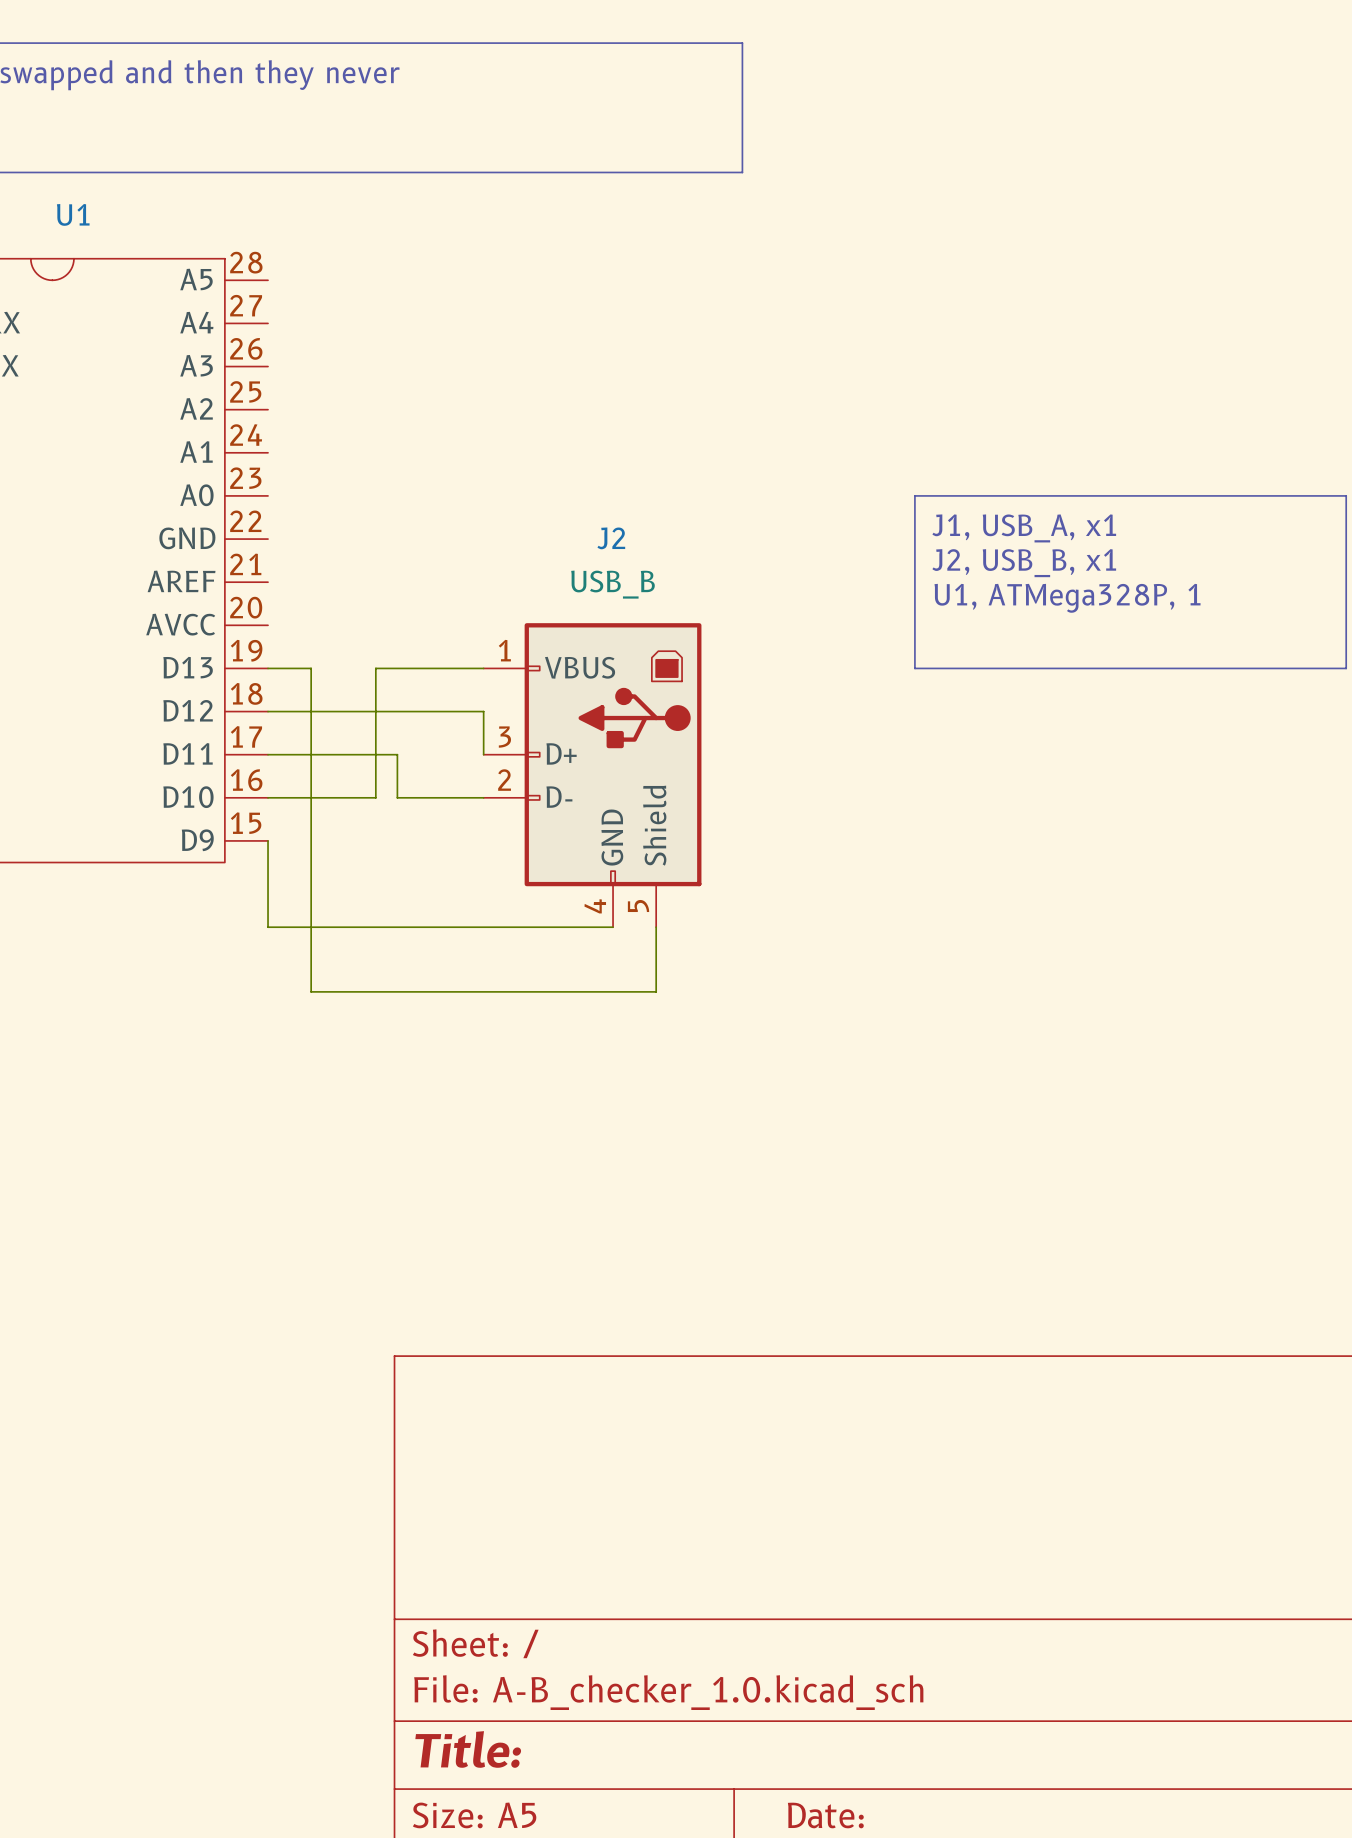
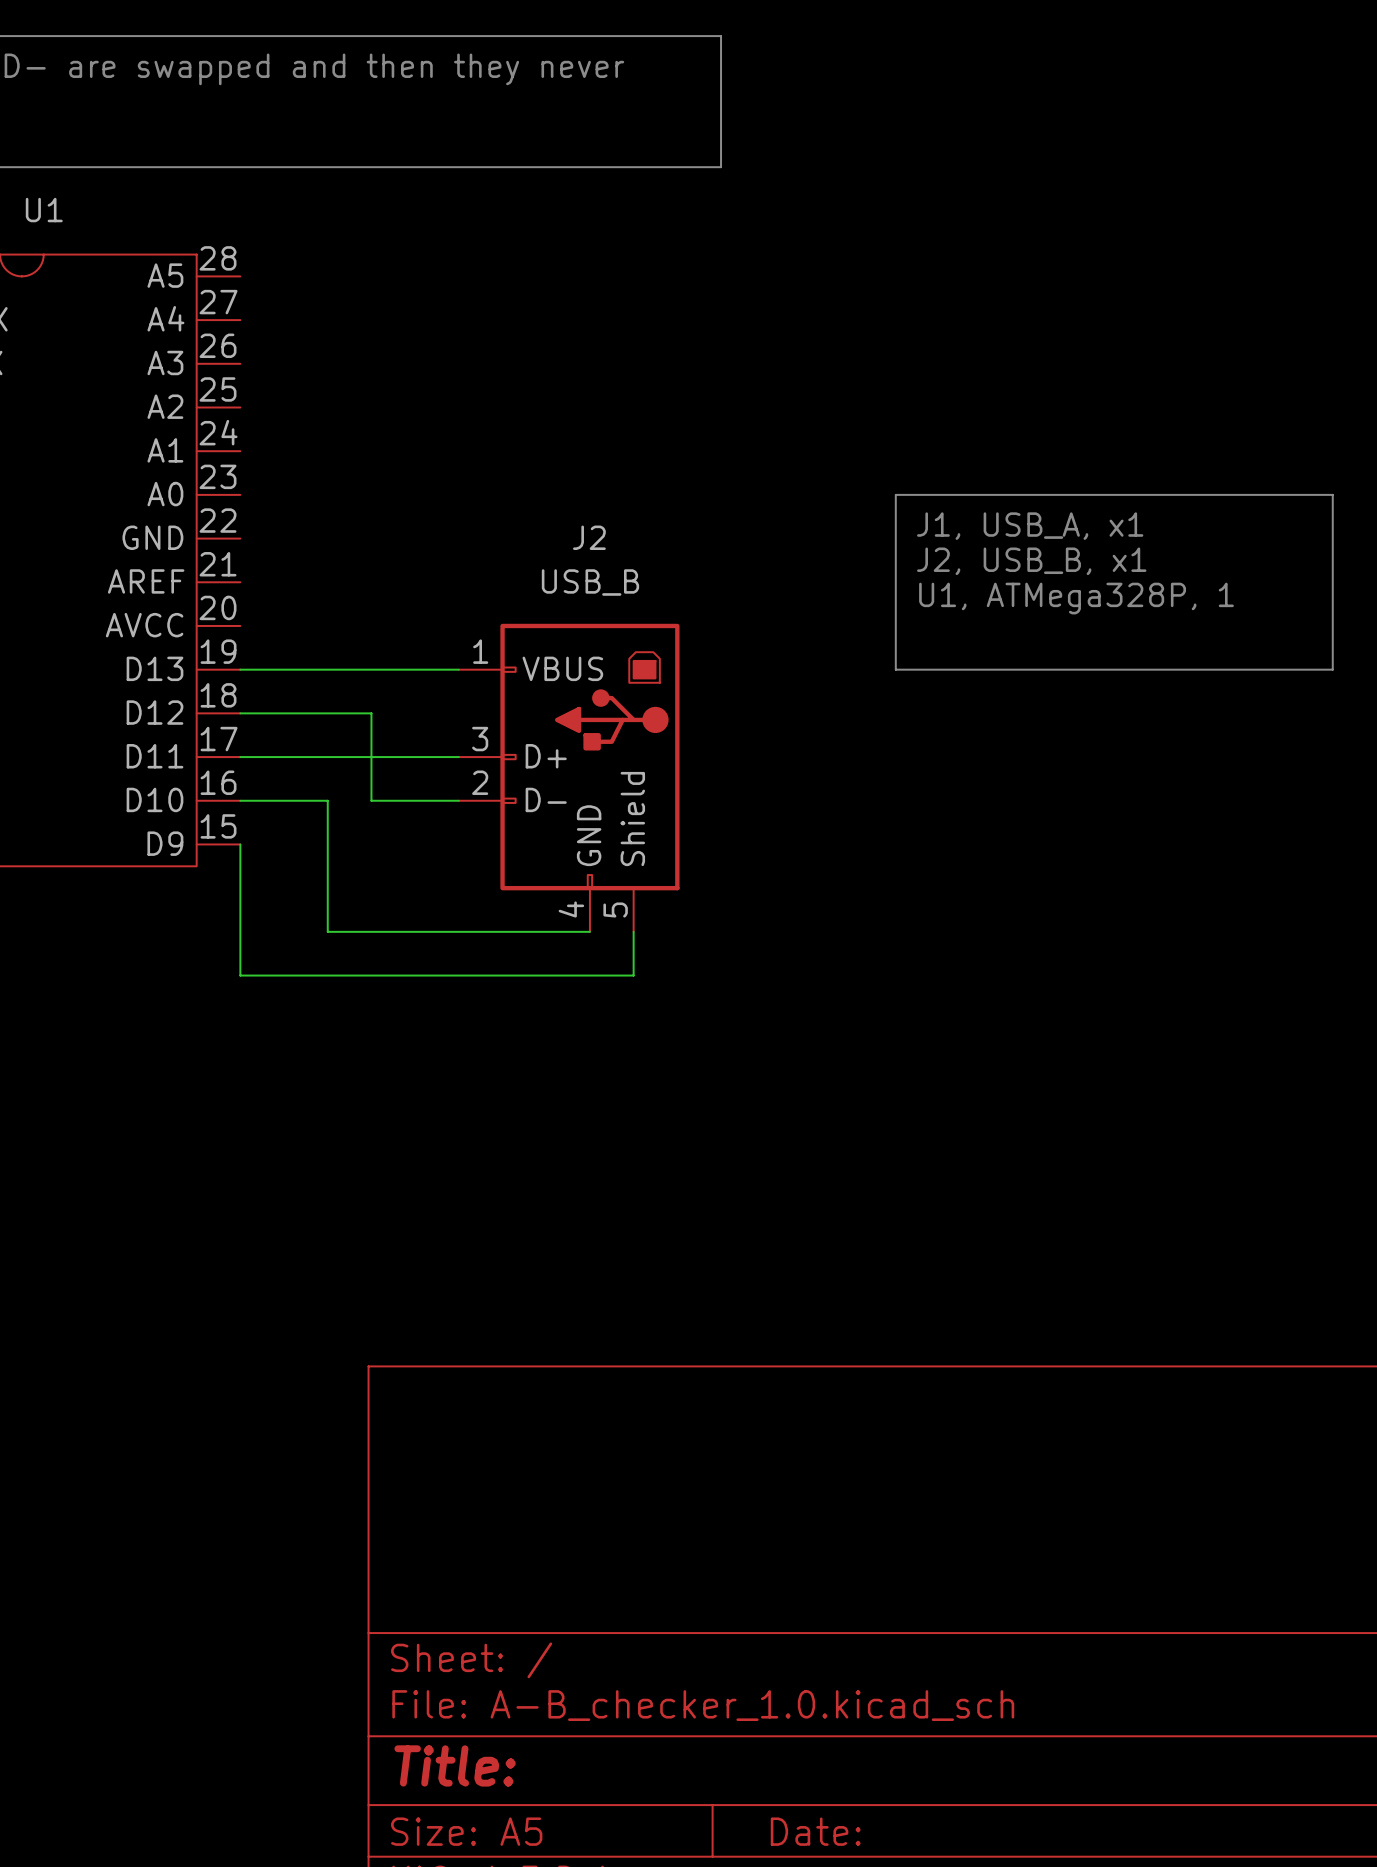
wire: (311, 668) (311, 991) (656, 991) (656, 970) -> (240, 931) (240, 975) (633, 975)
wire: (375, 668) (375, 797) (354, 797) -> (349, 669) (284, 669)
wire: (397, 711) (483, 711) (483, 754) -> (371, 713) (371, 757) (458, 757)
wire: (268, 927) (354, 927) -> (327, 800) (327, 931)

